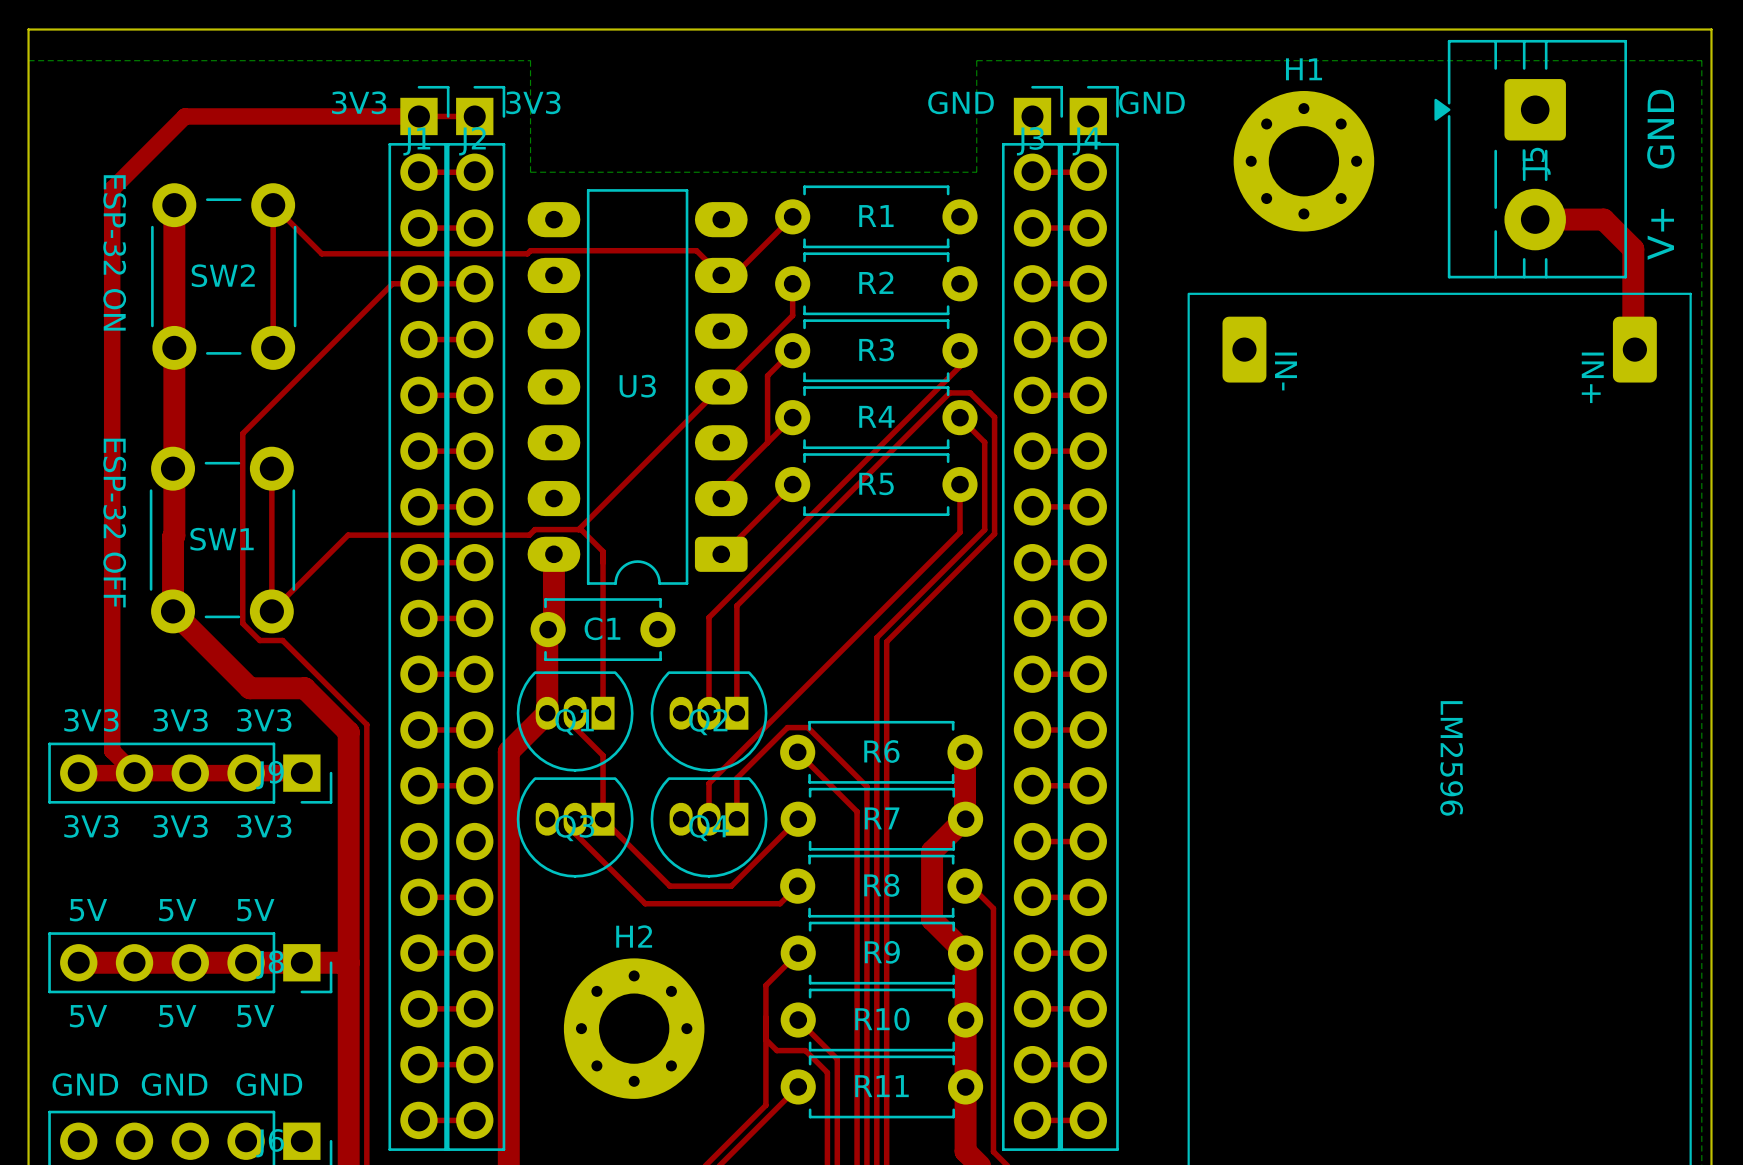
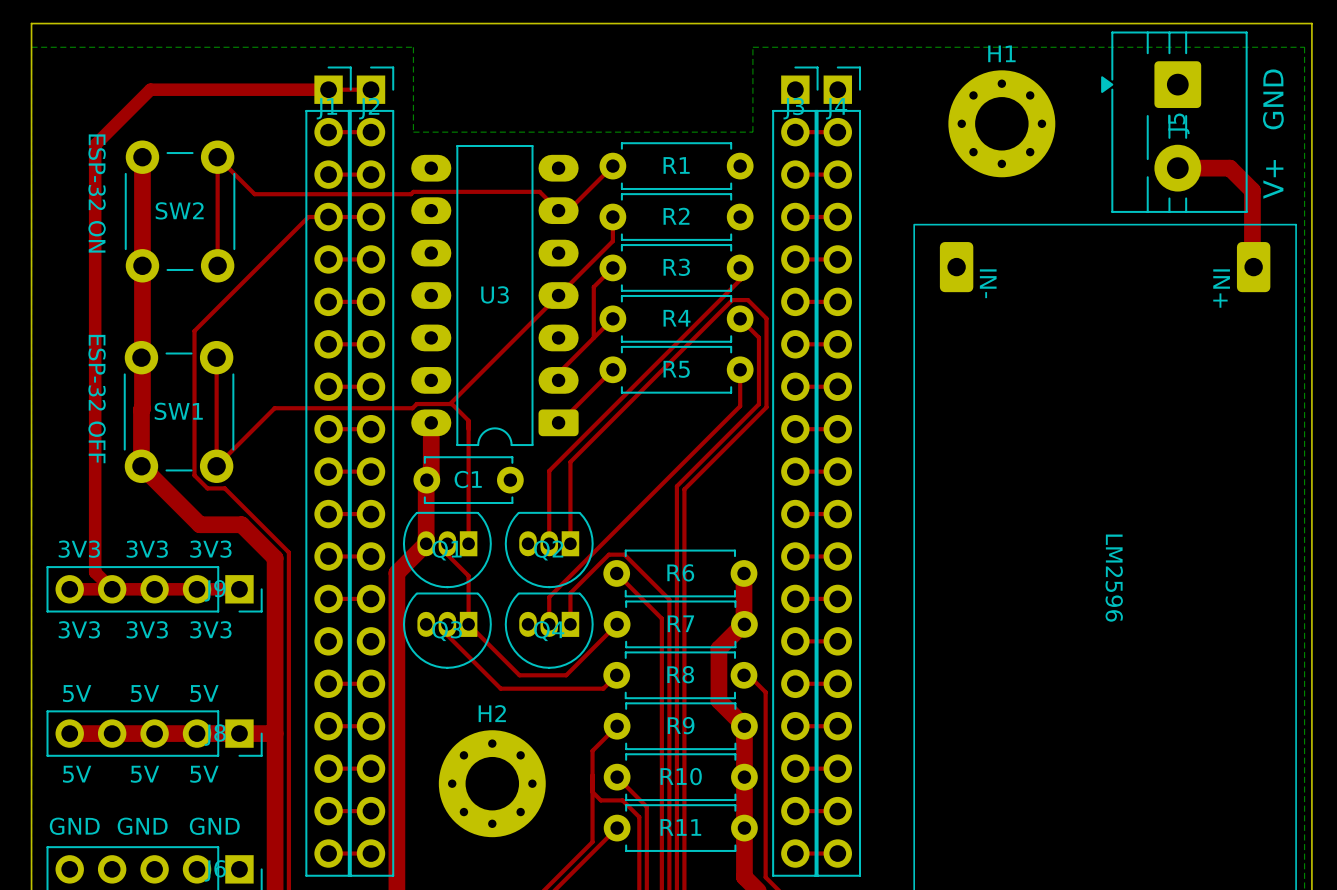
text: 3V3 (359, 102) -> none
text: 3V3 (533, 102) -> none
text: GND (961, 102) -> none
text: GND (1151, 102) -> none

